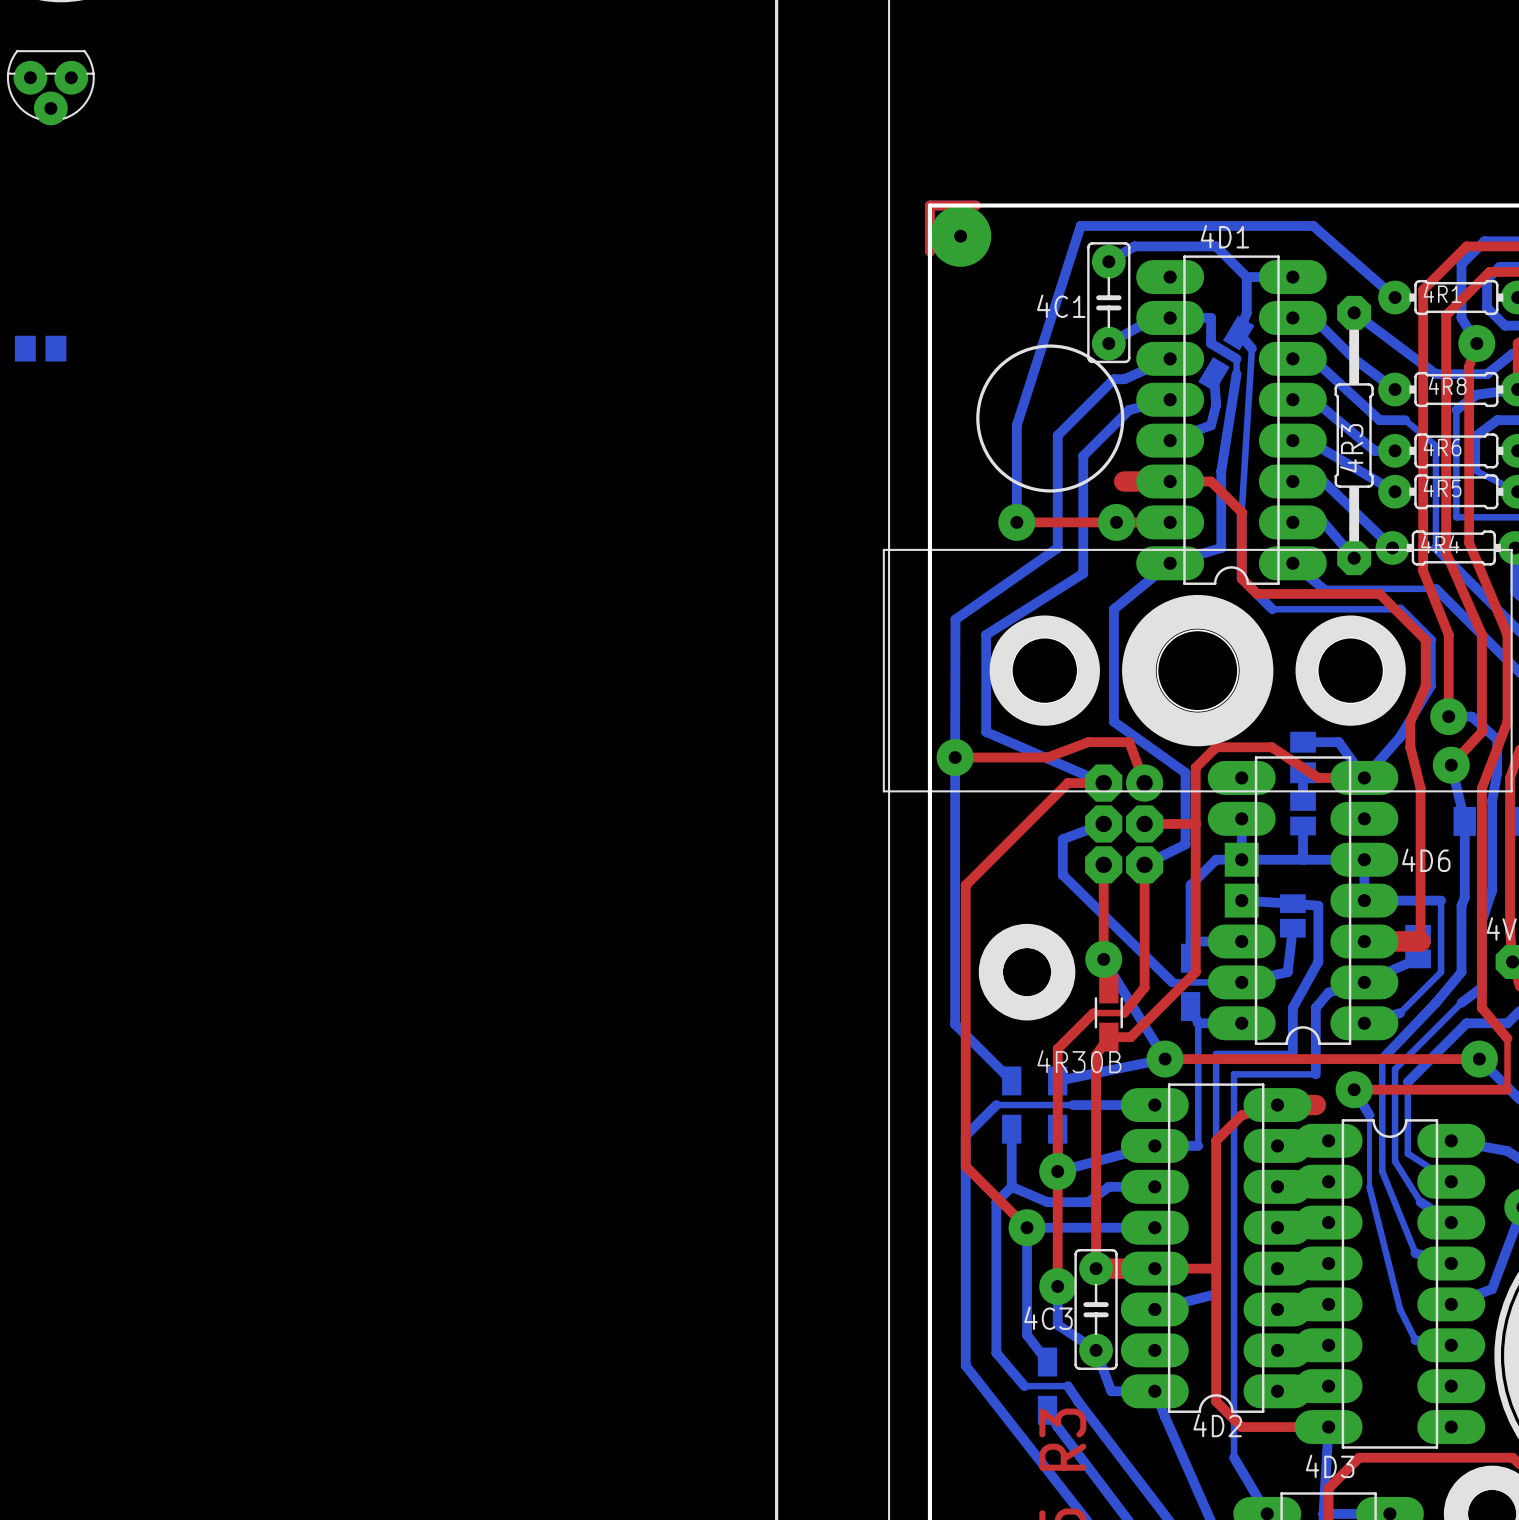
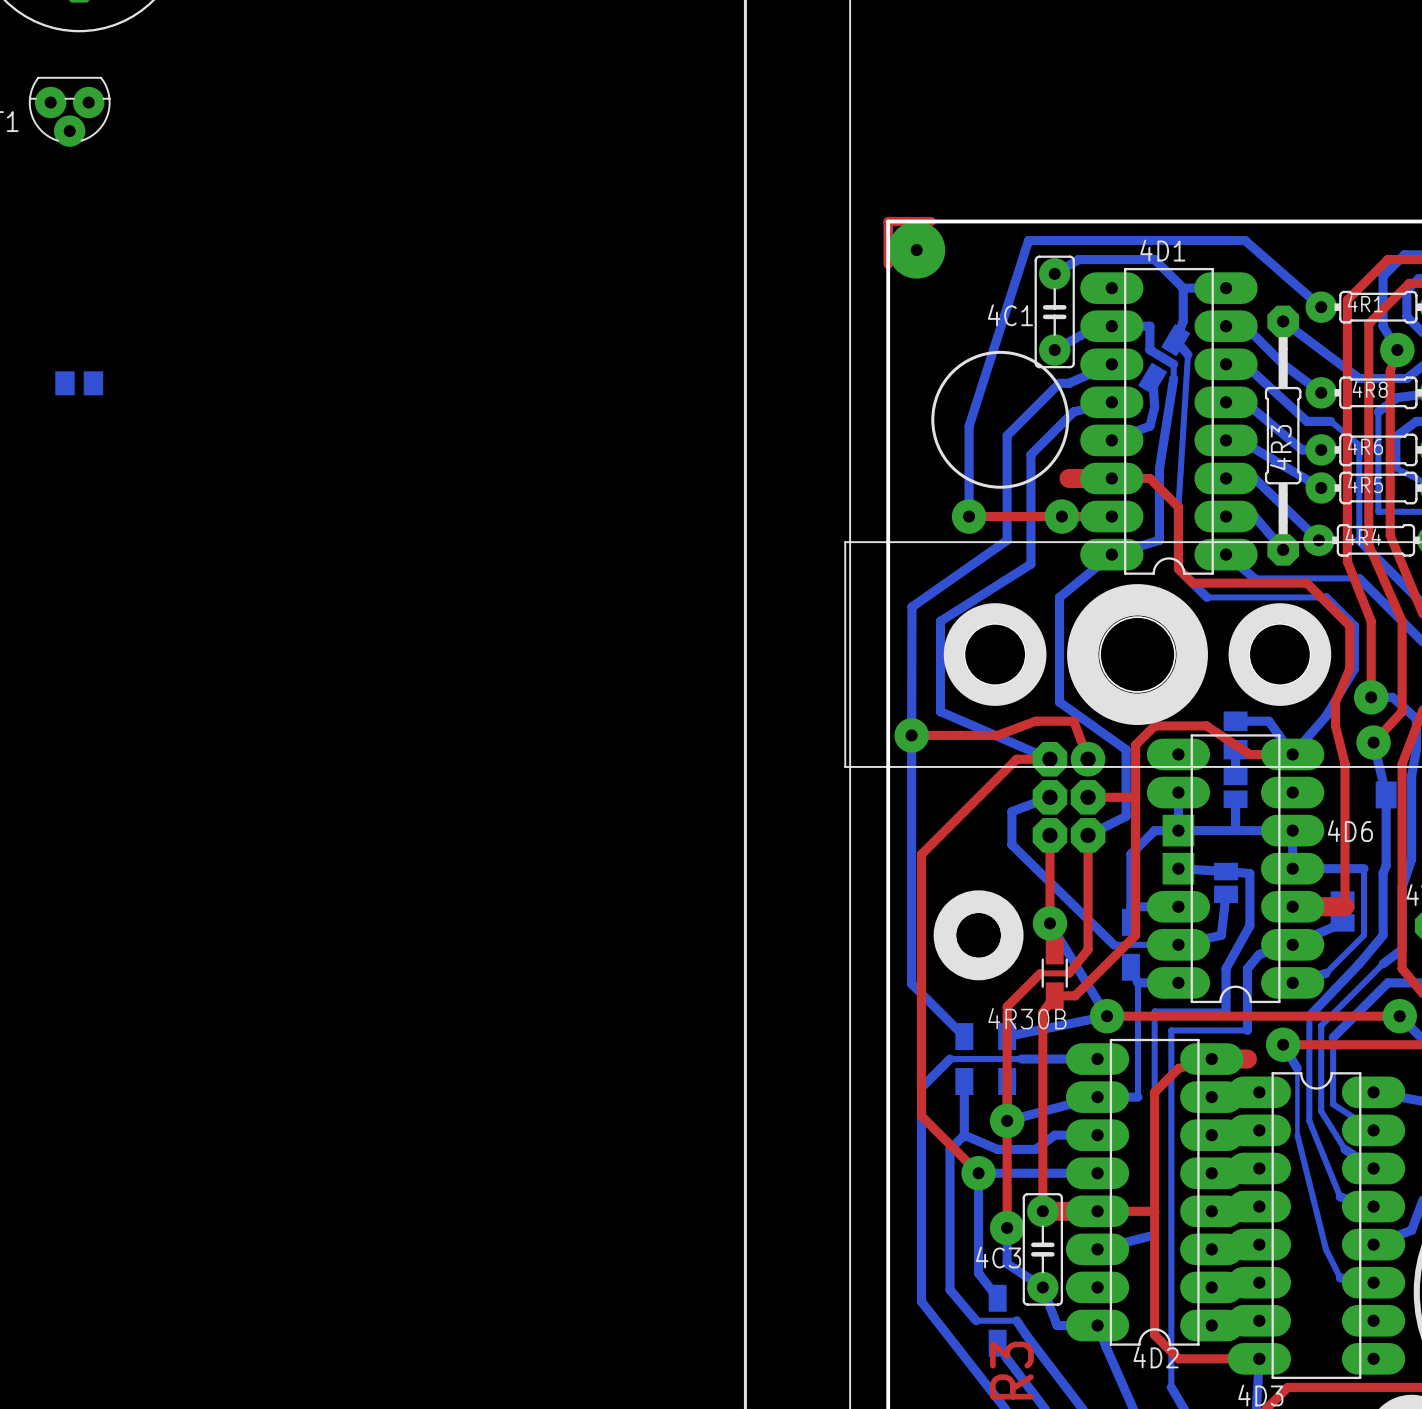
part position: (40, 348) -> (79, 383)

